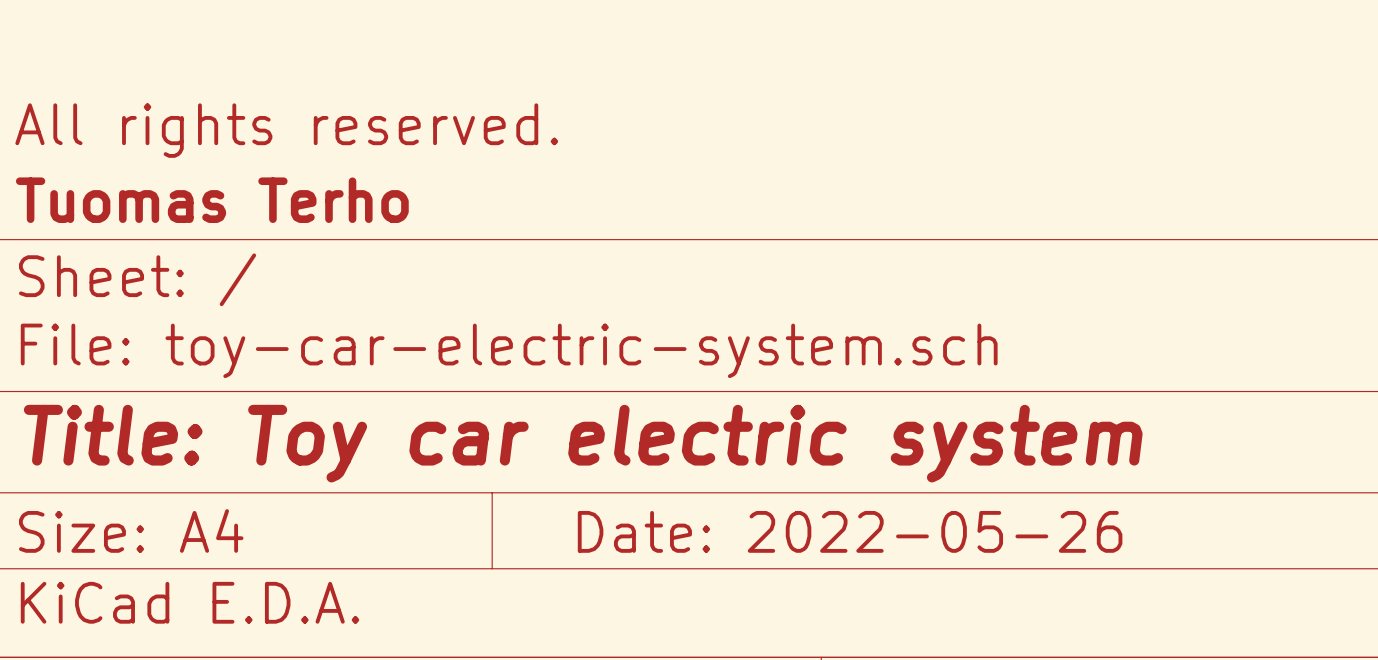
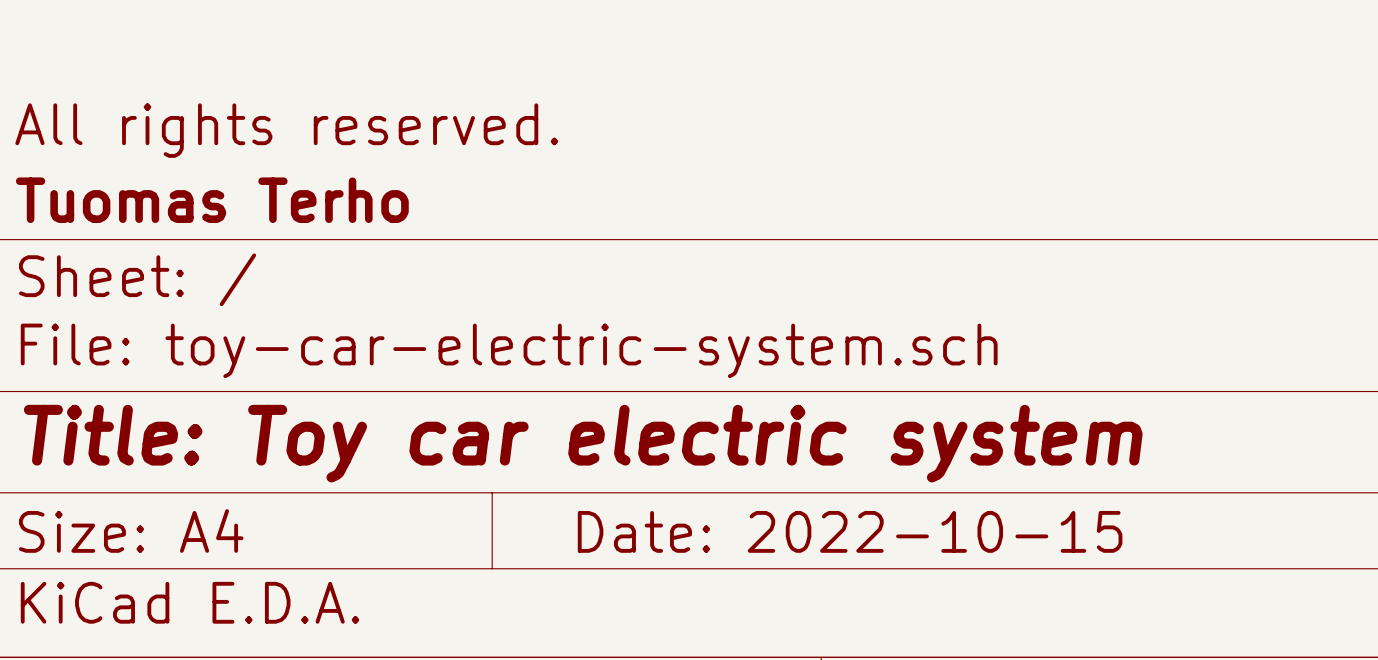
title block: Date: 2022-05-26 (850, 531) -> Date: 2022-10-15 (850, 531)

